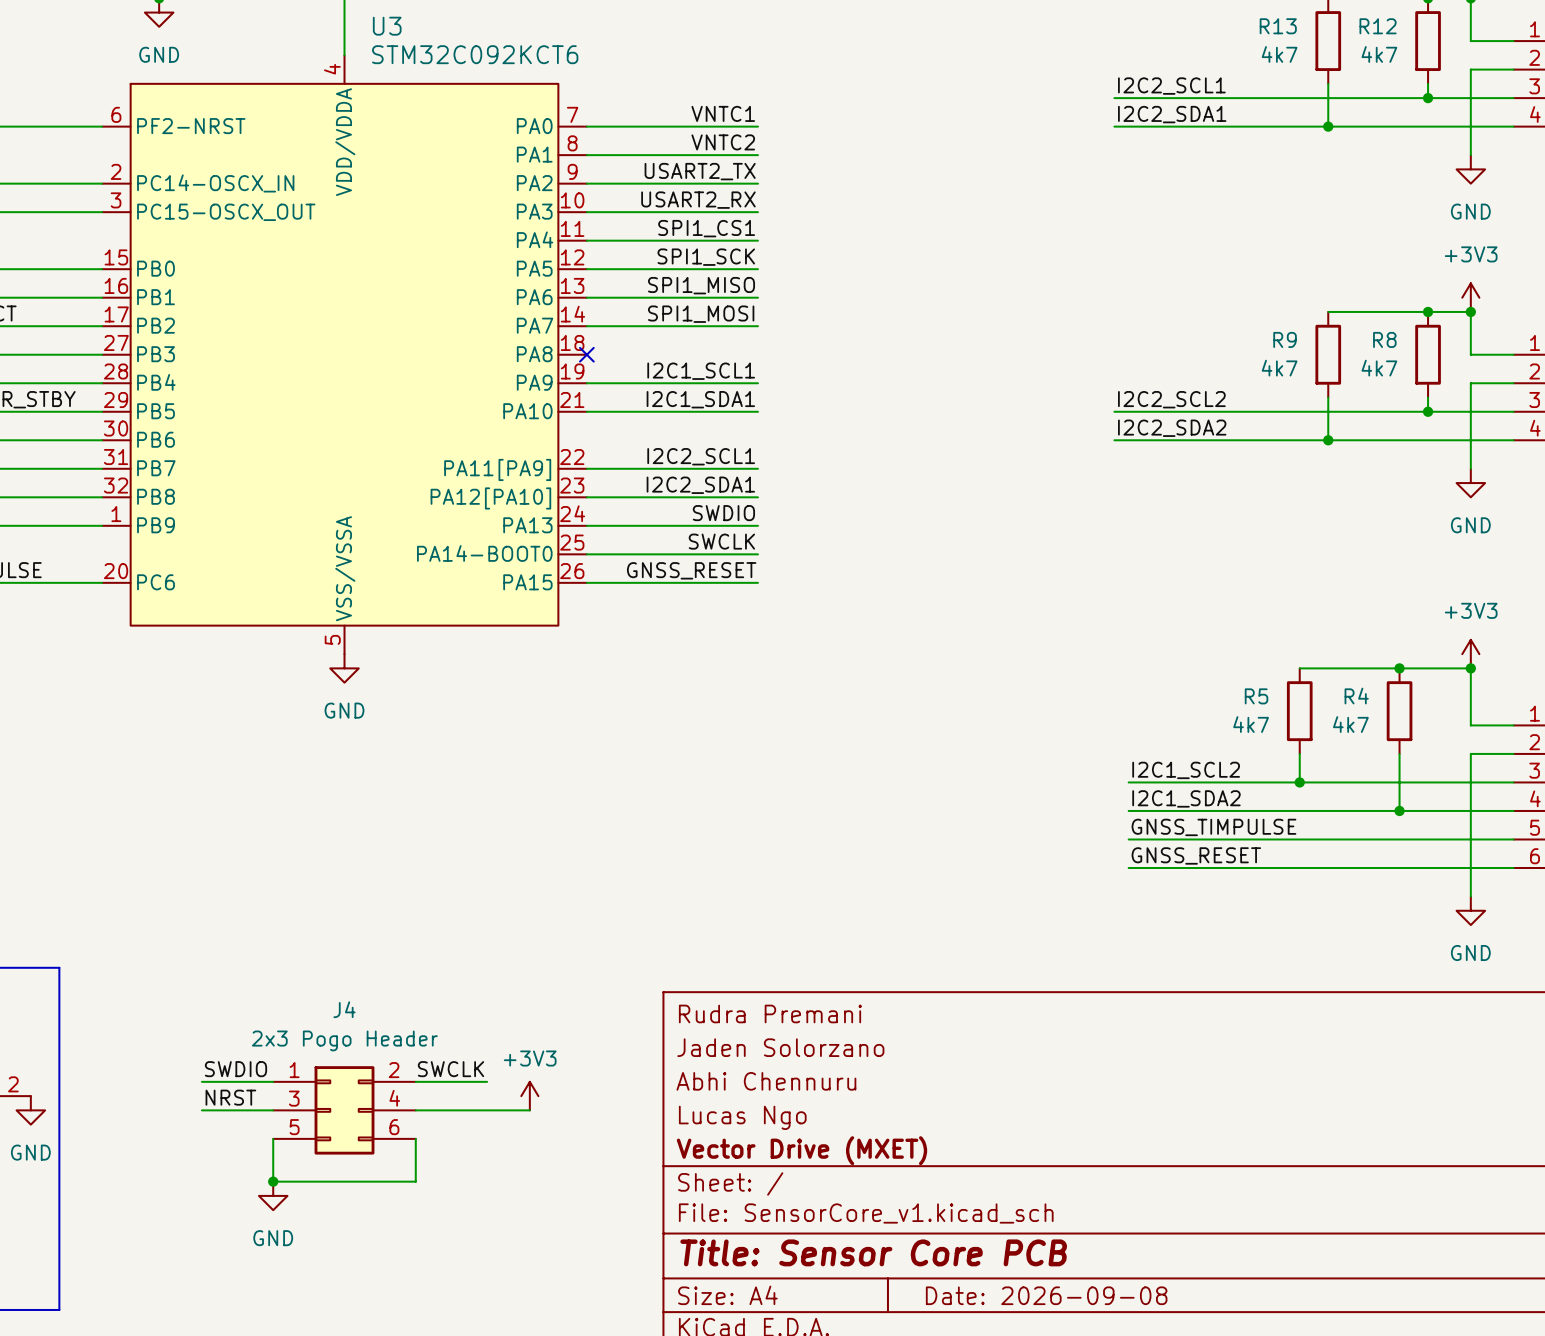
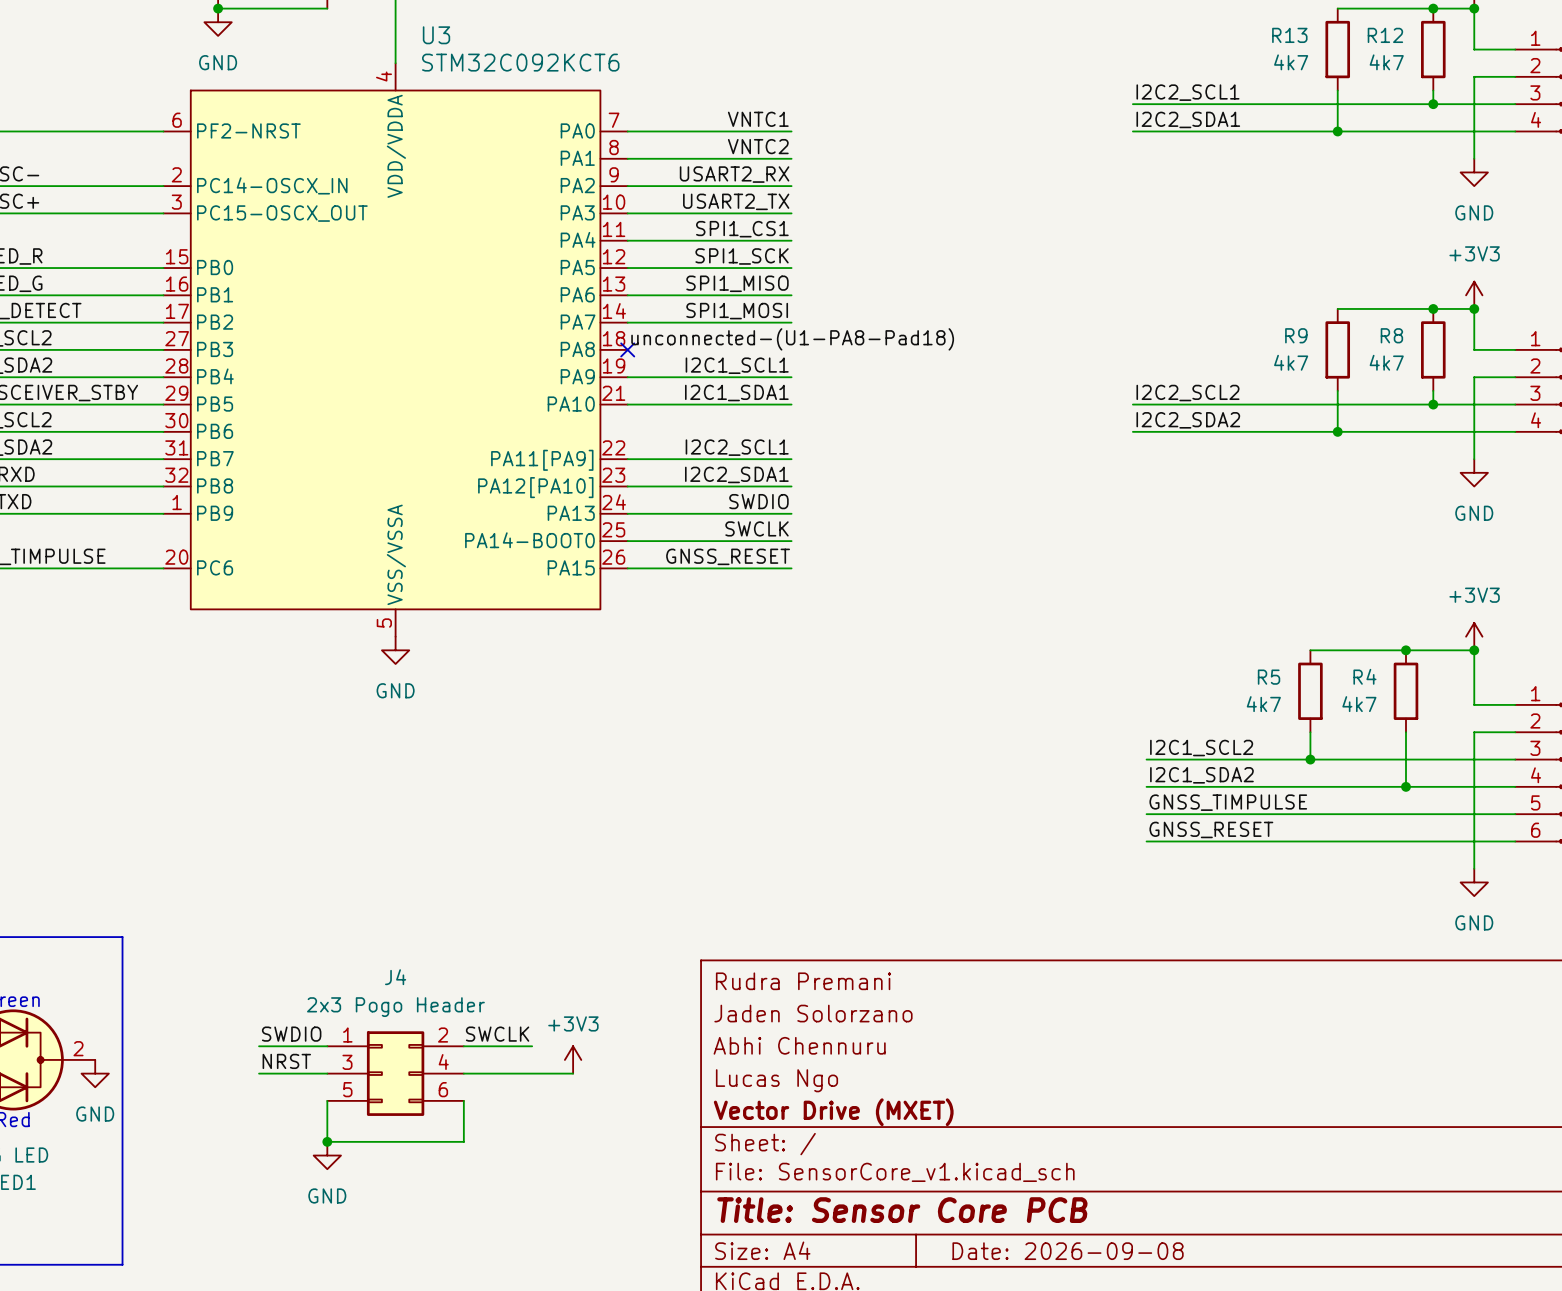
label: USART2_TX (700, 171) -> USART2_RX (734, 174)
label: USART2_RX (698, 200) -> USART2_TX (736, 201)
label: none -> unconnected-(U1-PA8-Pad18) (792, 339)

